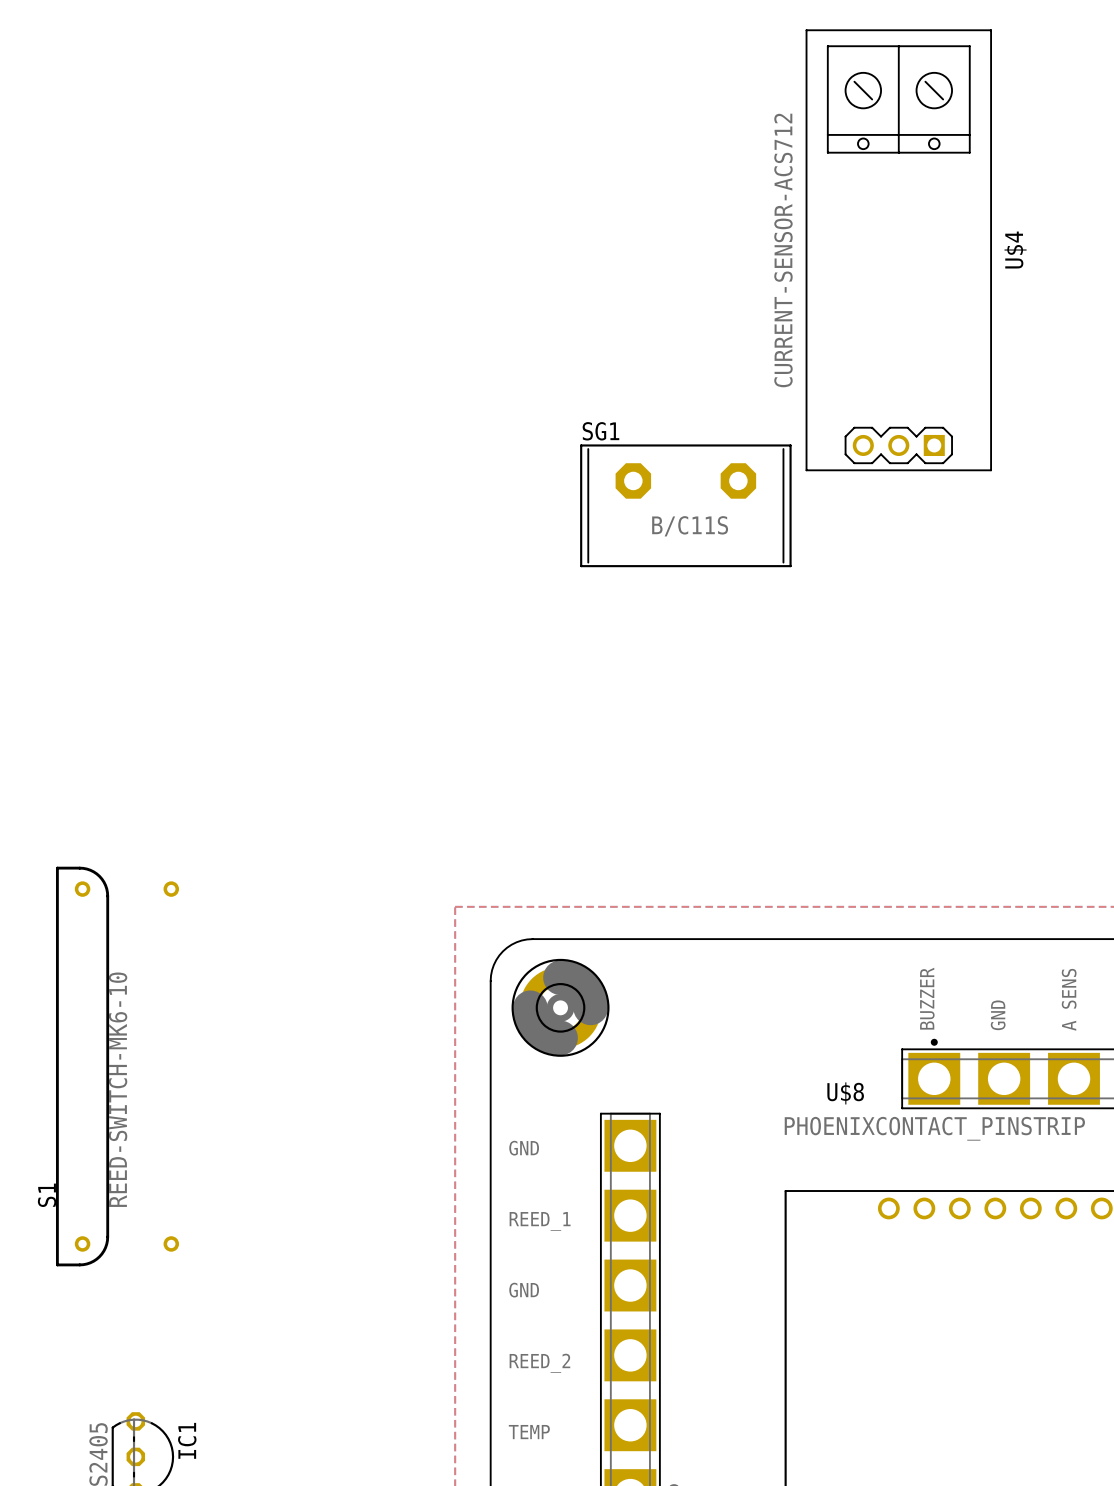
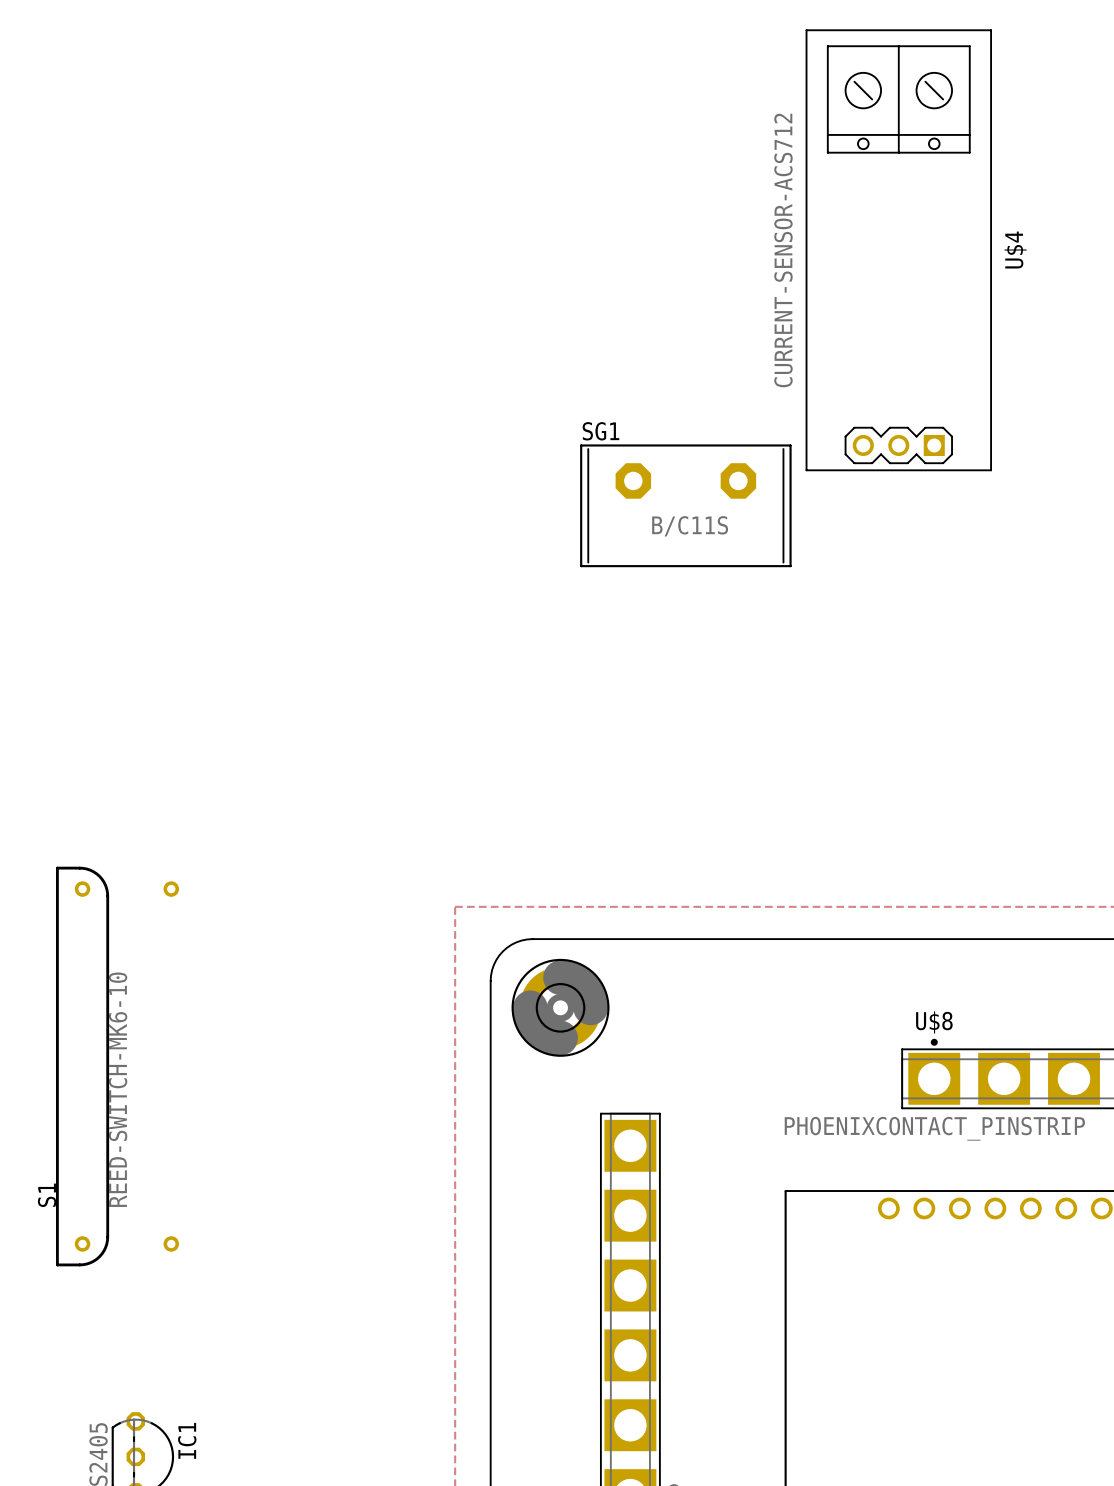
text: BUZZER (927, 998) -> none
text: A SENS (1069, 999) -> none
text: GND (998, 1015) -> none
U$8 name position: U$8 (845, 1093) -> U$8 (934, 1022)
text: GND (524, 1148) -> none
text: REED_1 (540, 1221) -> none
text: GND (524, 1290) -> none
text: REED_2 (539, 1363) -> none
text: TEMP (529, 1432) -> none

